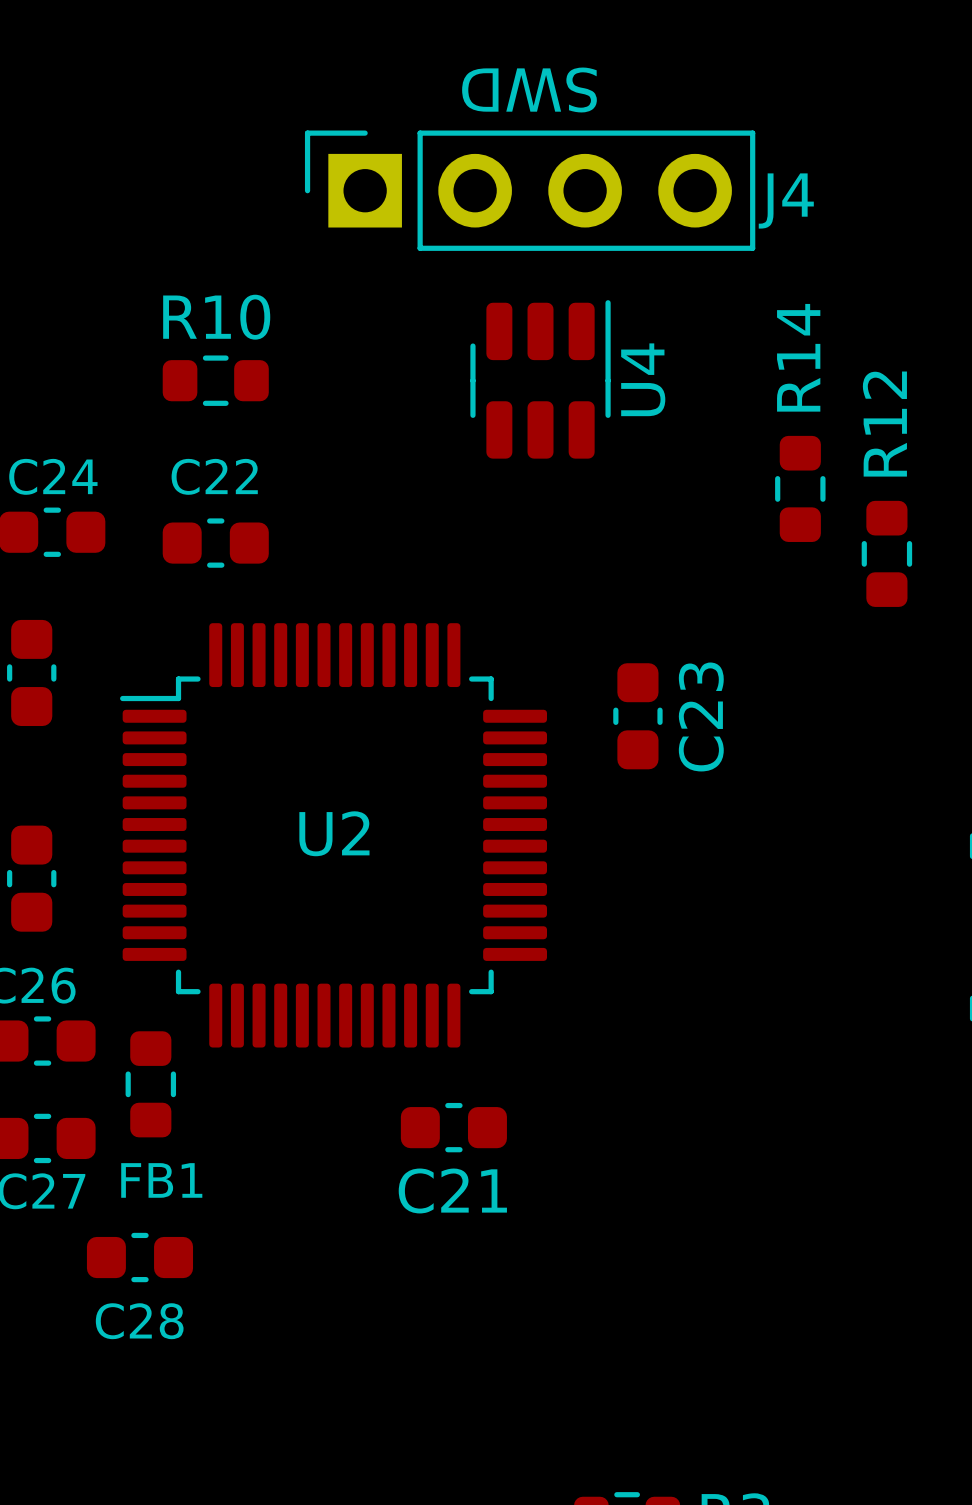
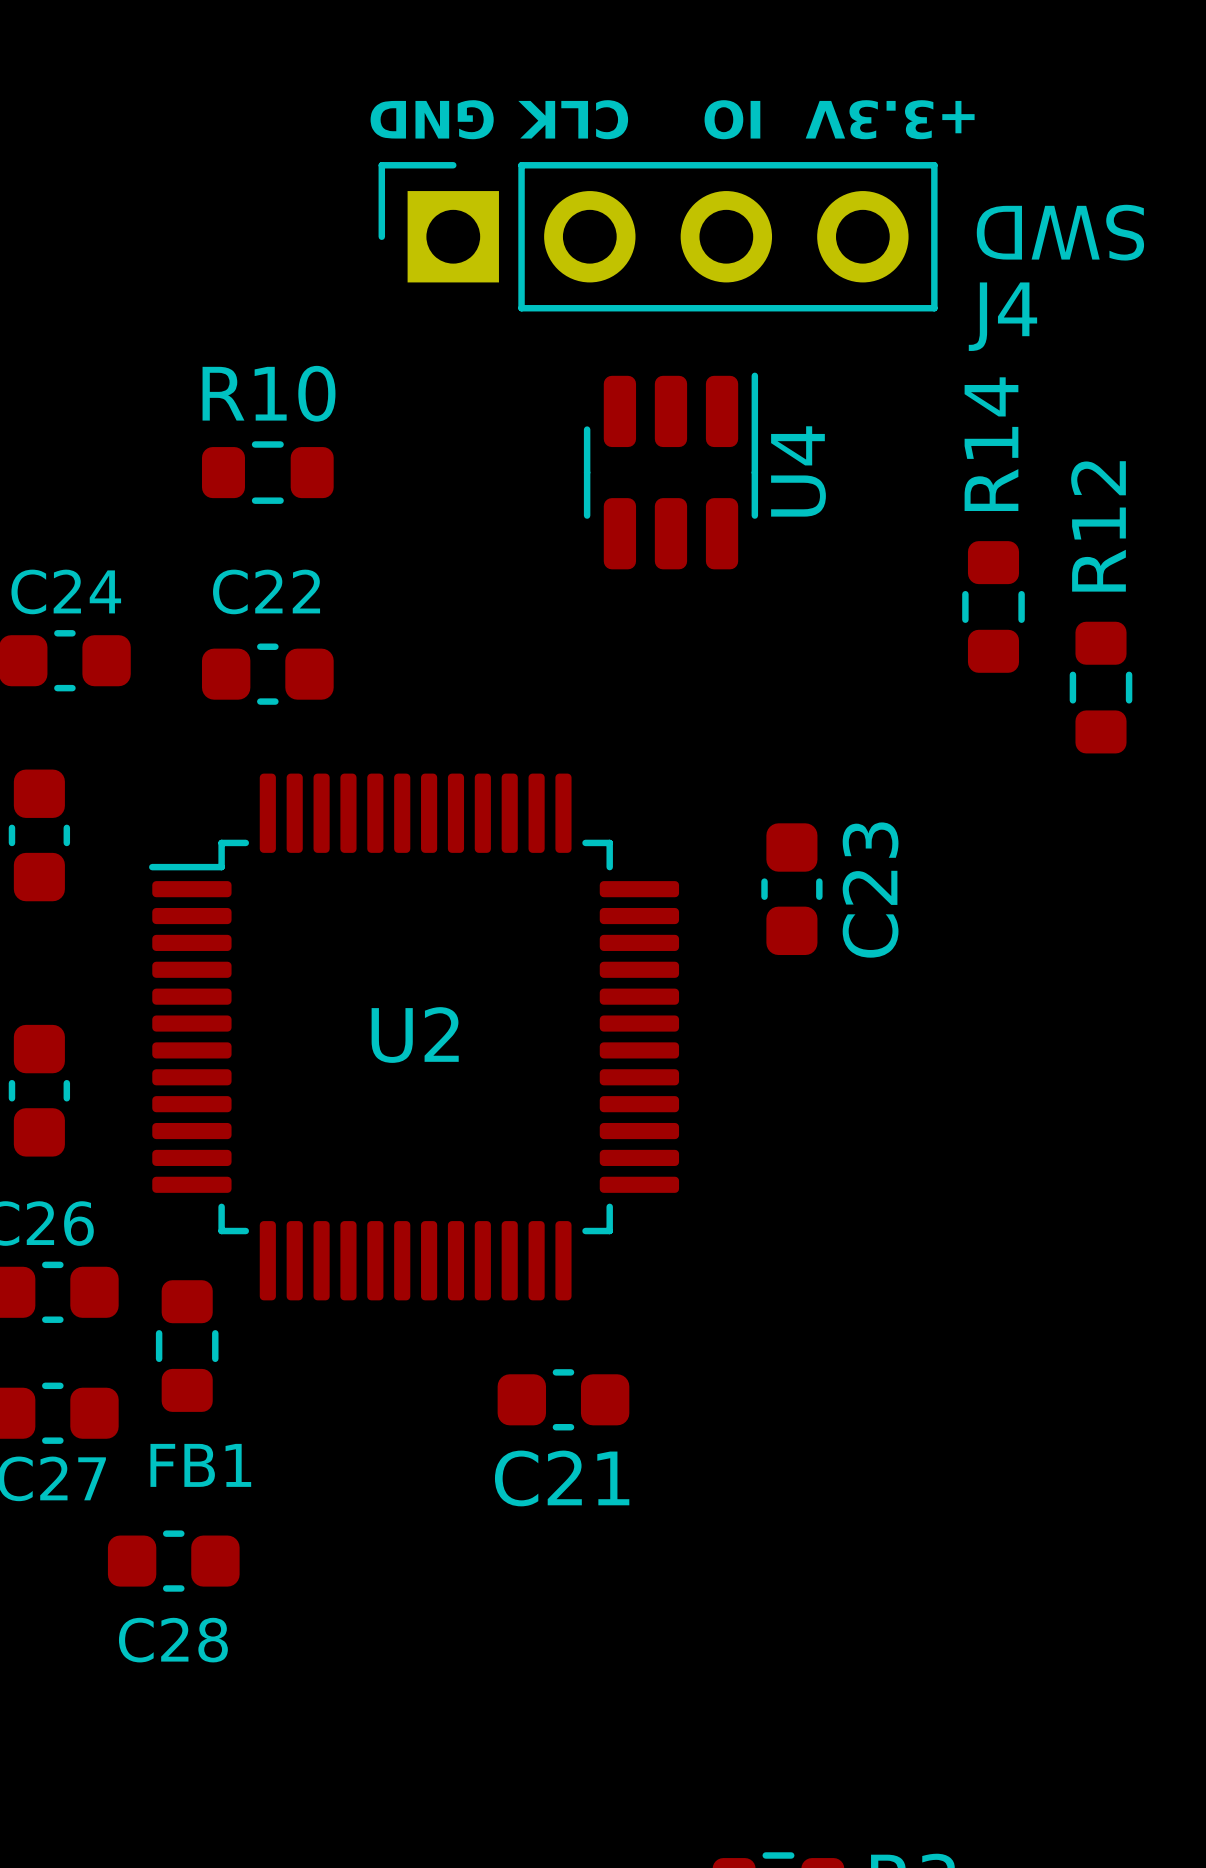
J4 text position: SWD (529, 89) -> SWD (1060, 232)
text: none -> GND (432, 119)
text: none -> CLK (573, 119)
text: none -> IO (732, 119)
text: none -> +3.3V (890, 119)
J4 name position: J4 (786, 200) -> J4 (1002, 316)

